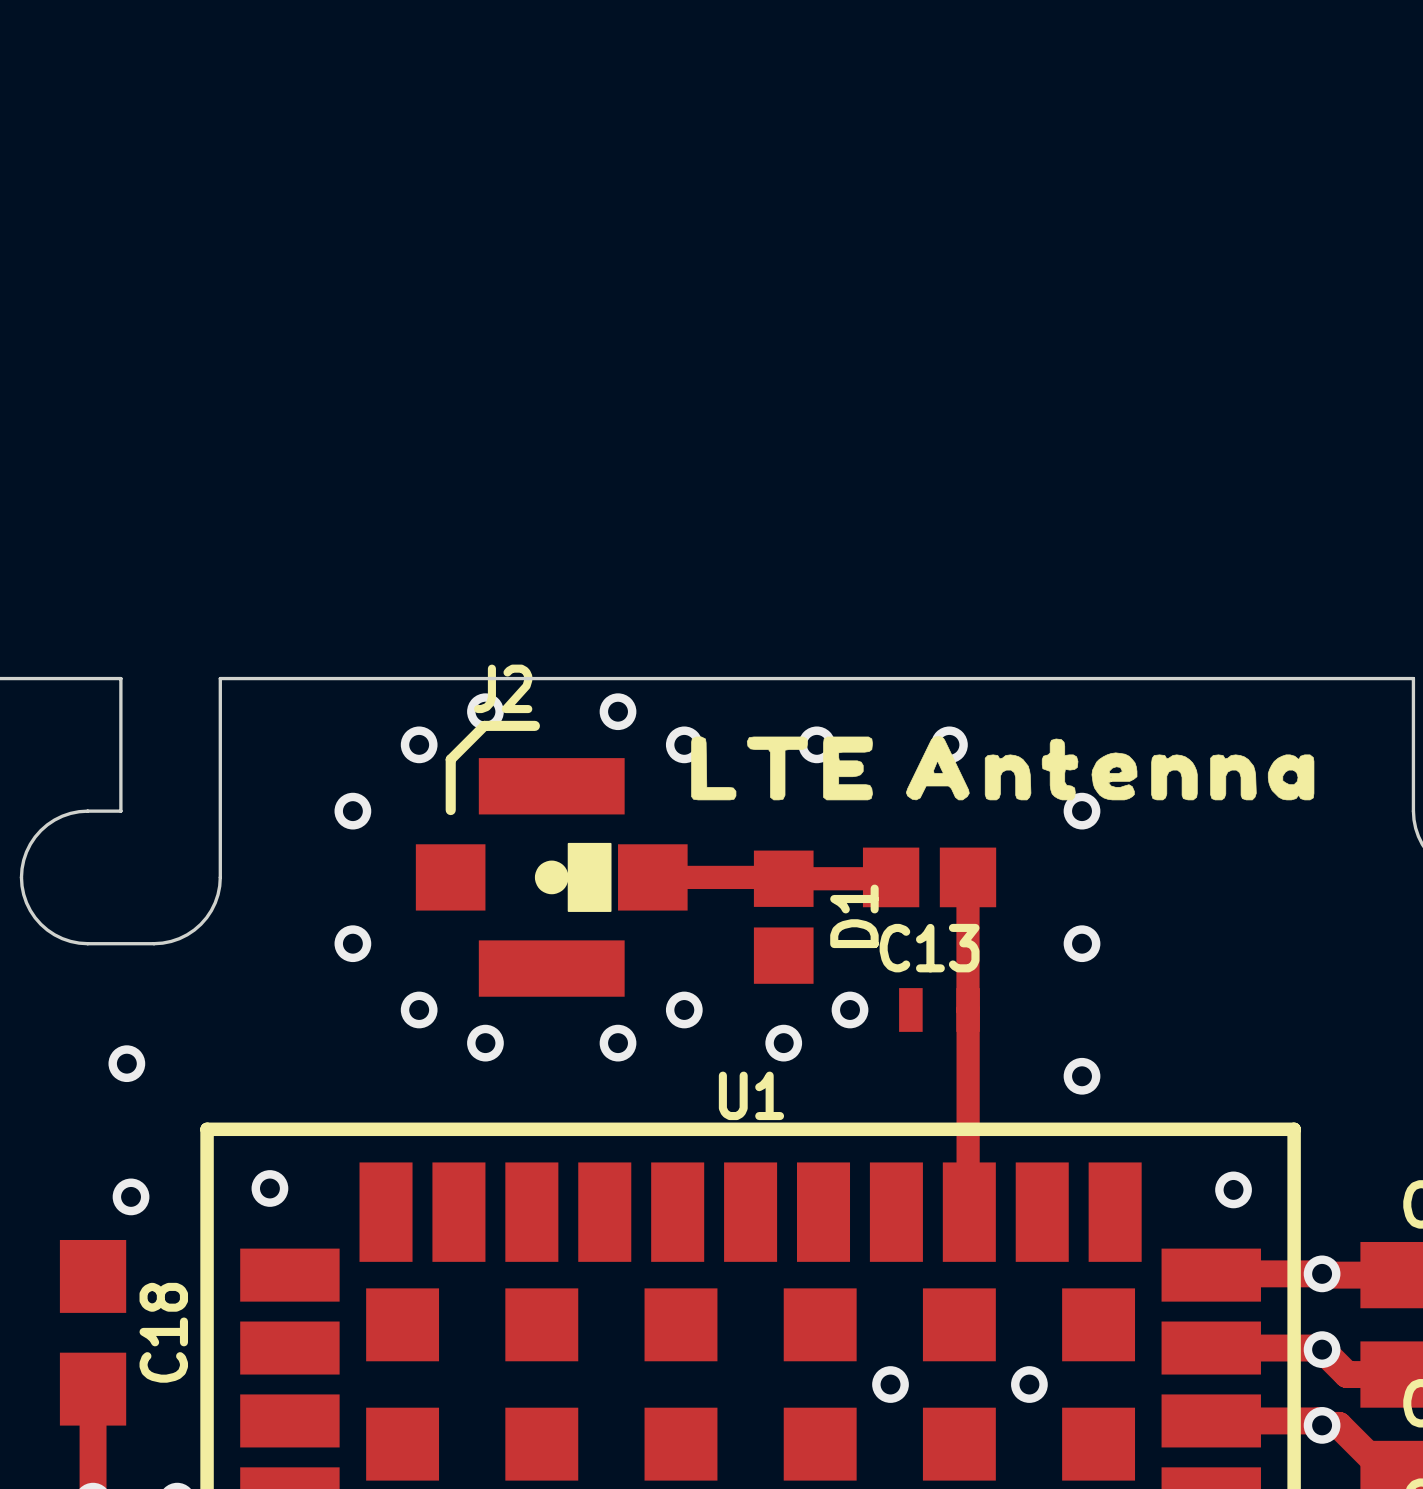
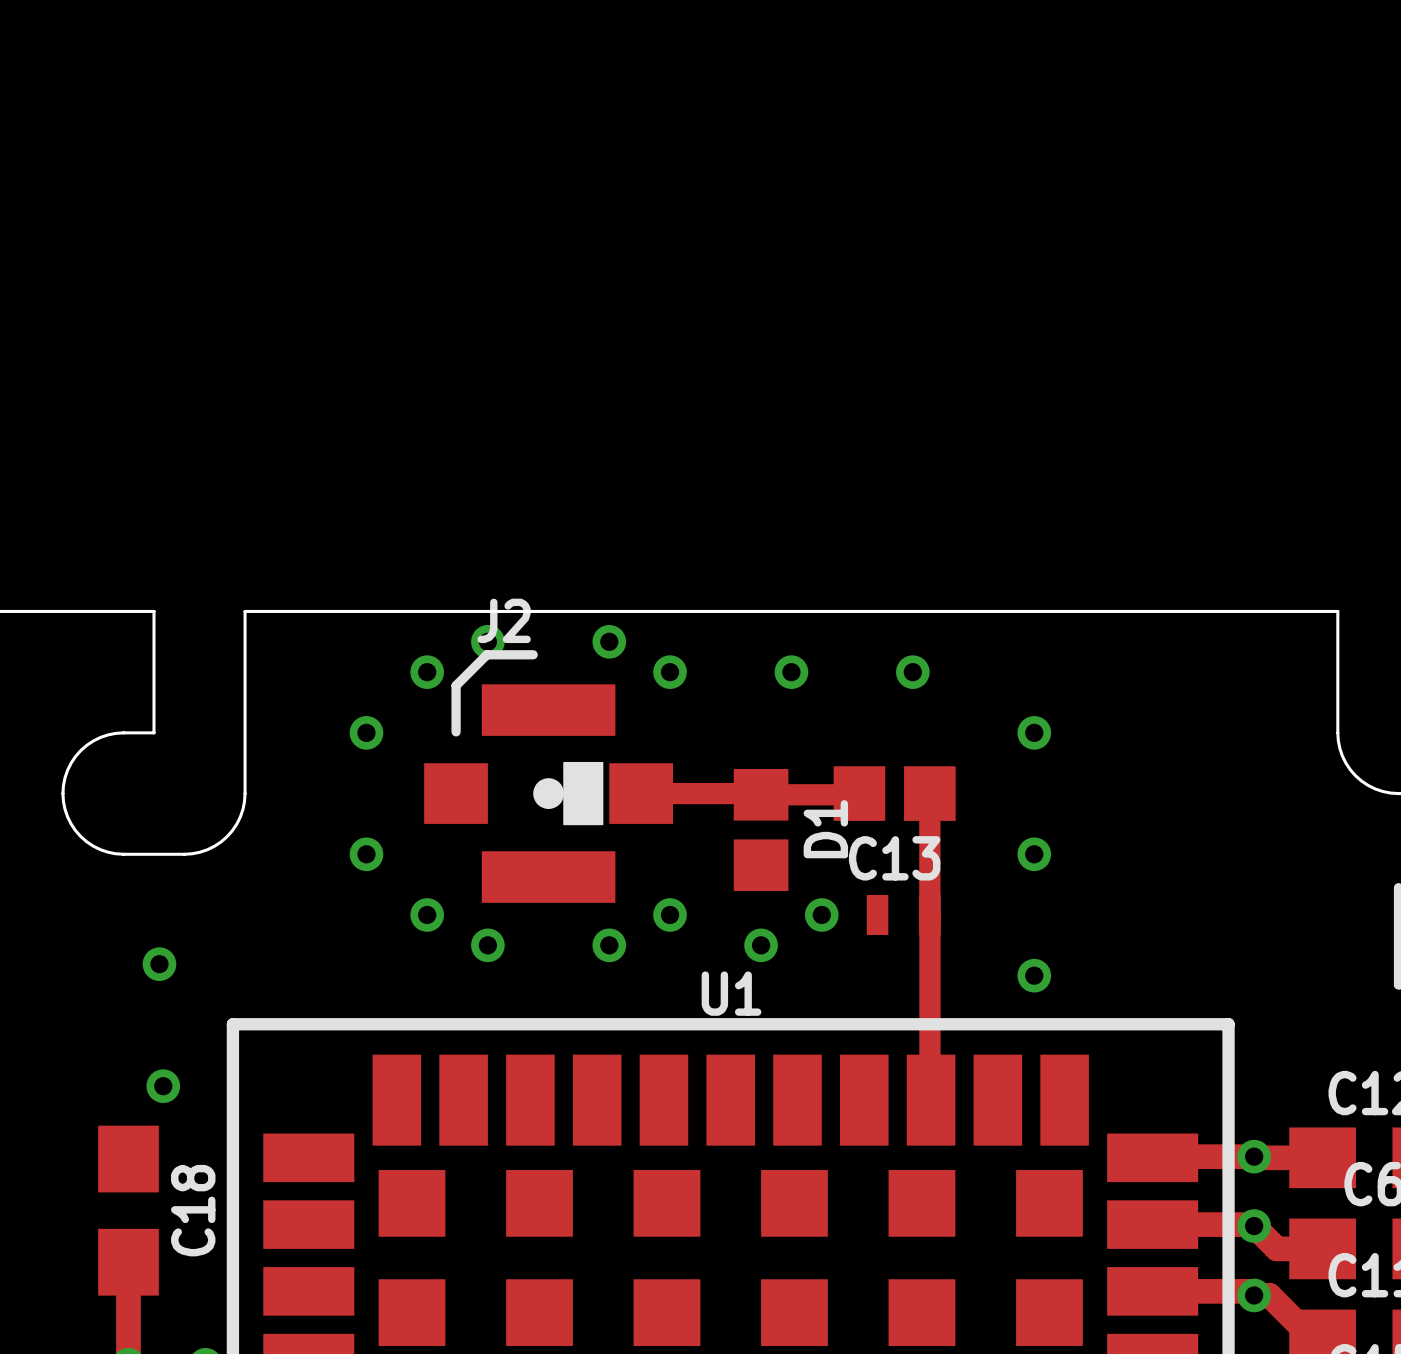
drawing: [691, 735, 1315, 801] -> none
via: (269, 1188) -> none
via: (1233, 1189) -> none
via: (890, 1384) -> none
via: (1029, 1384) -> none

